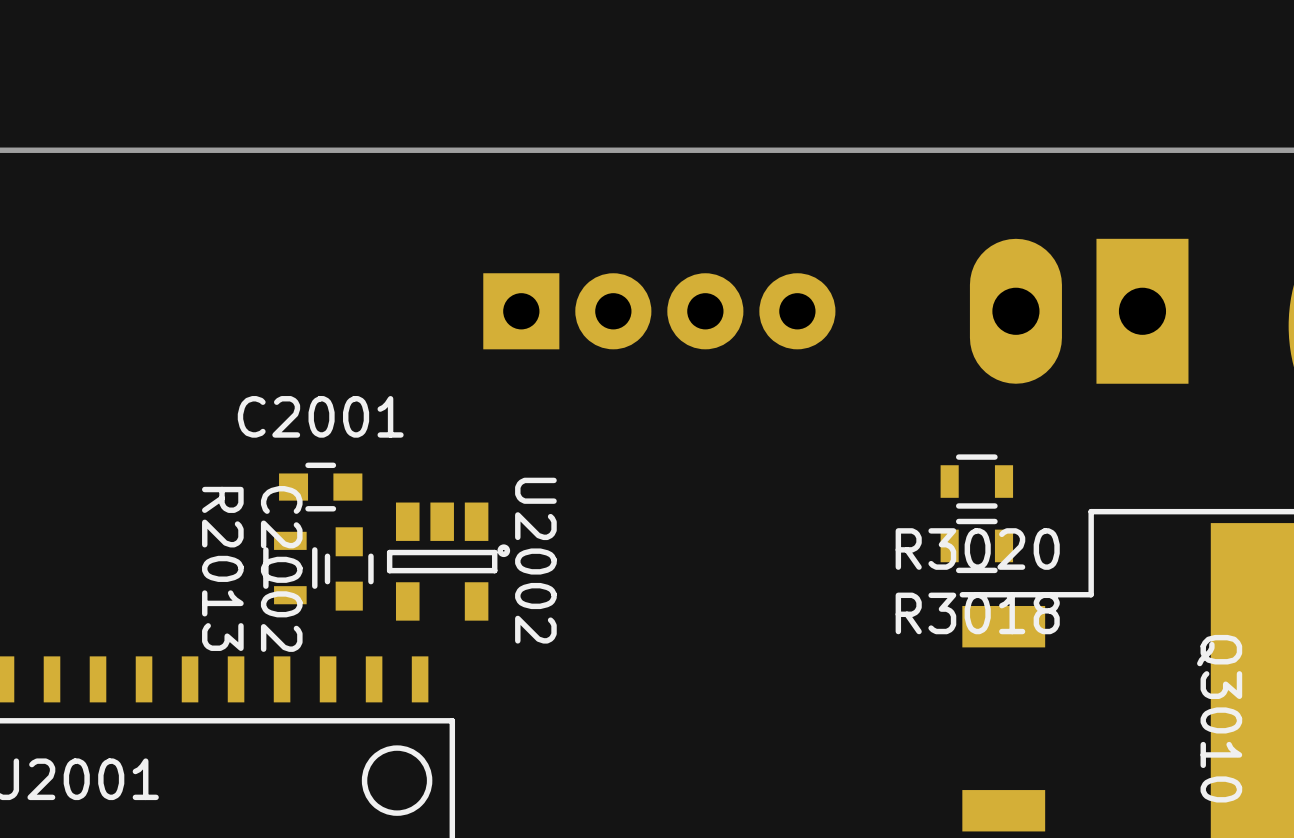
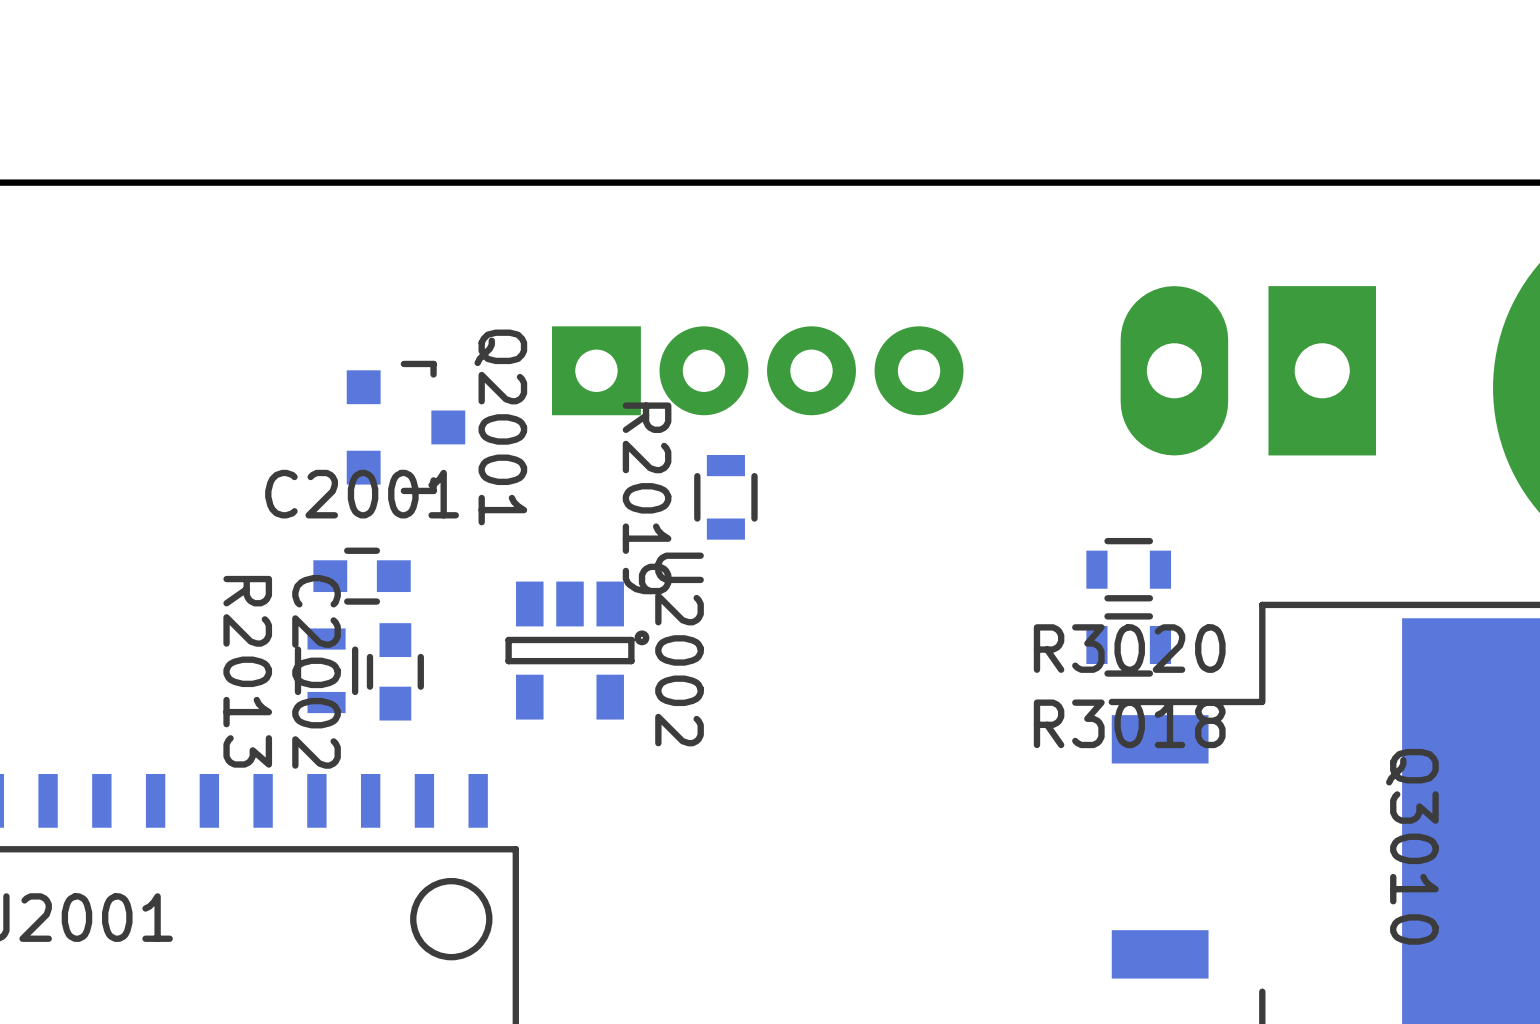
Q2001: none -> (405, 427)
R2019: none -> (725, 497)
U2002 position: (448, 561) -> (577, 650)

